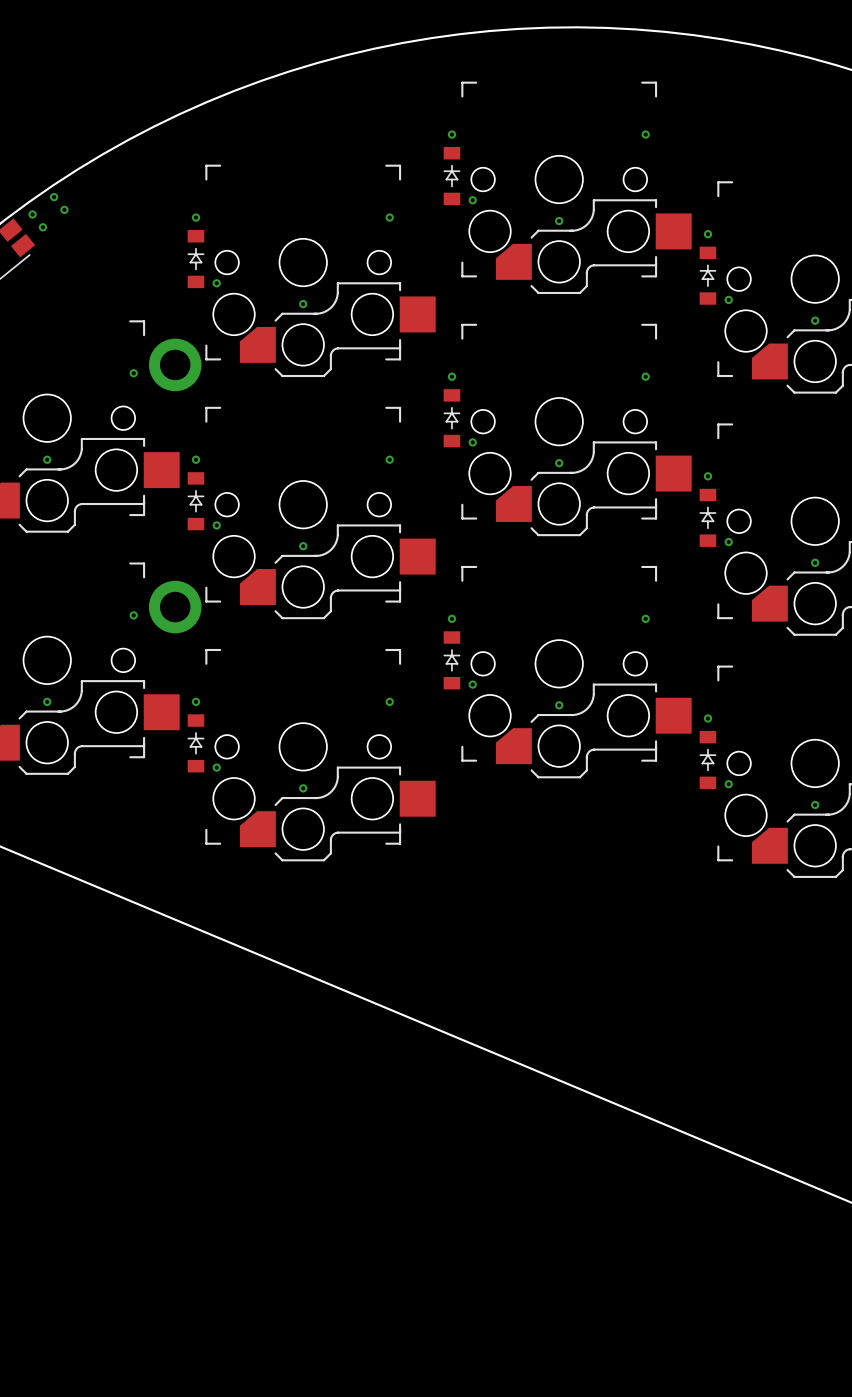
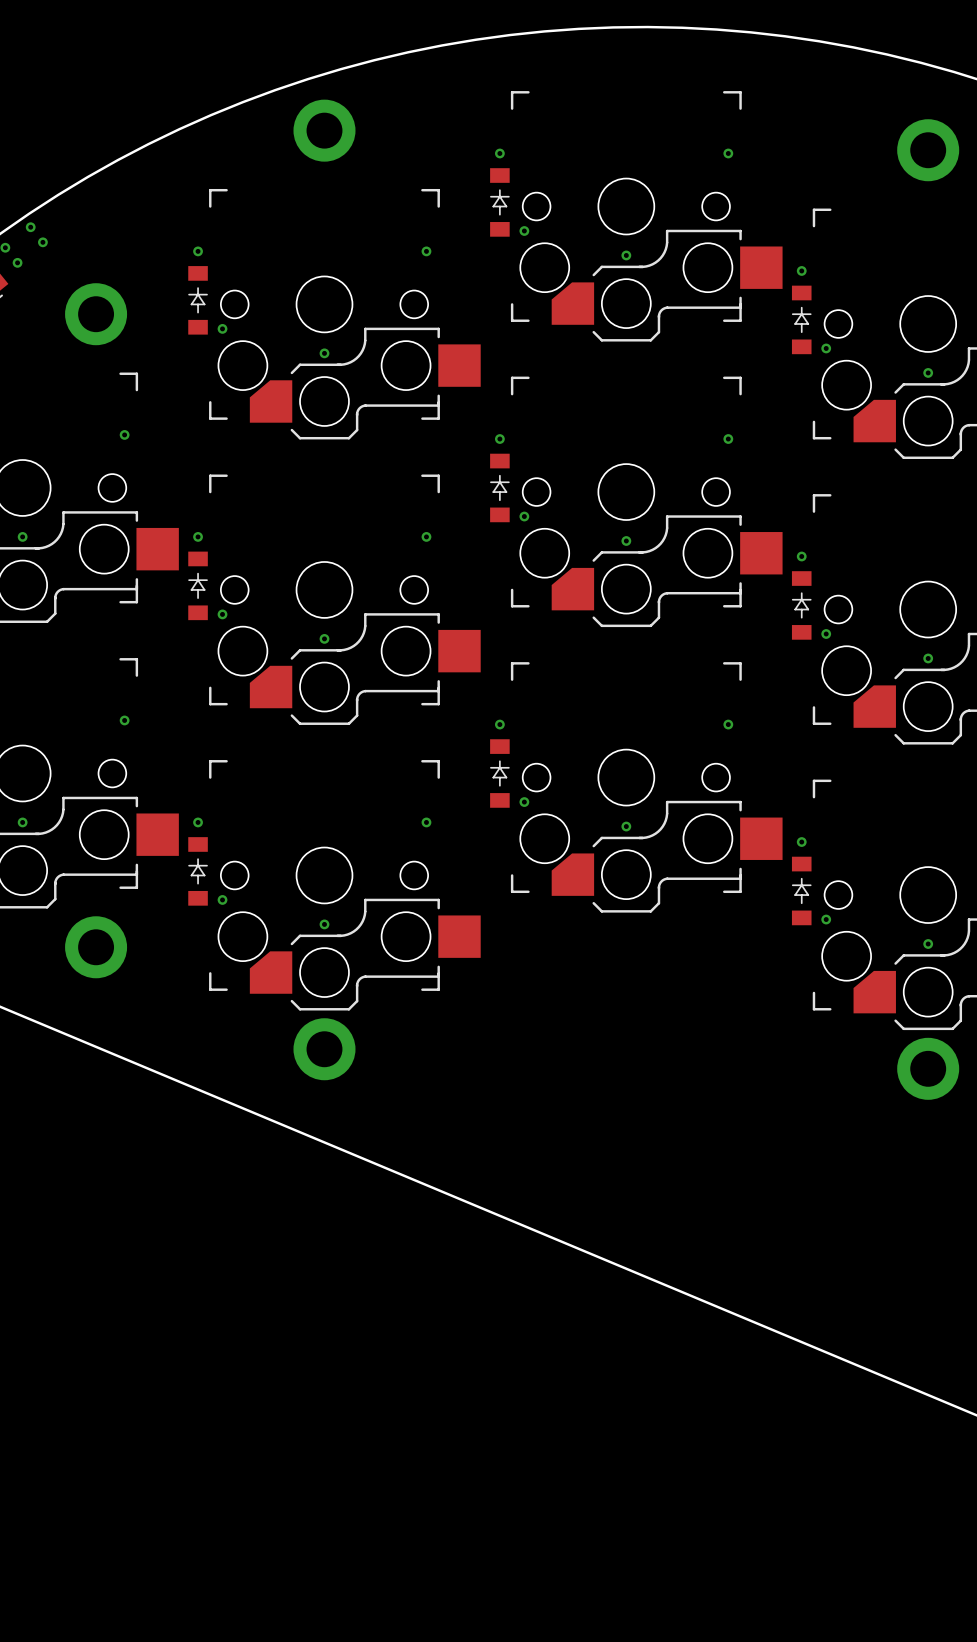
part: none -> (324, 130)
part: none -> (928, 150)
part position: (175, 364) -> (96, 314)
part: (175, 607) -> none
part: none -> (96, 947)
part: none -> (324, 1049)
part: none -> (928, 1068)

